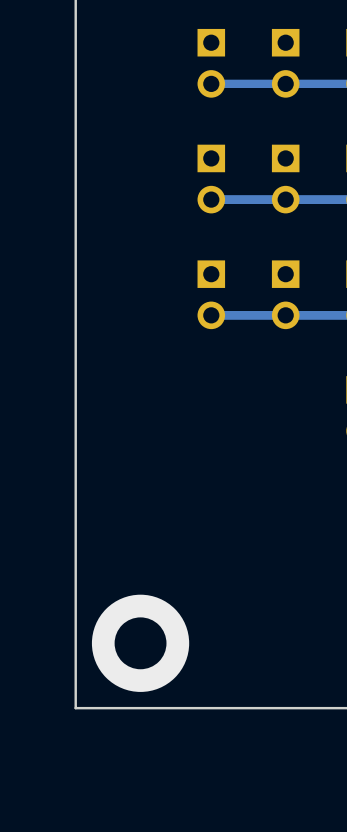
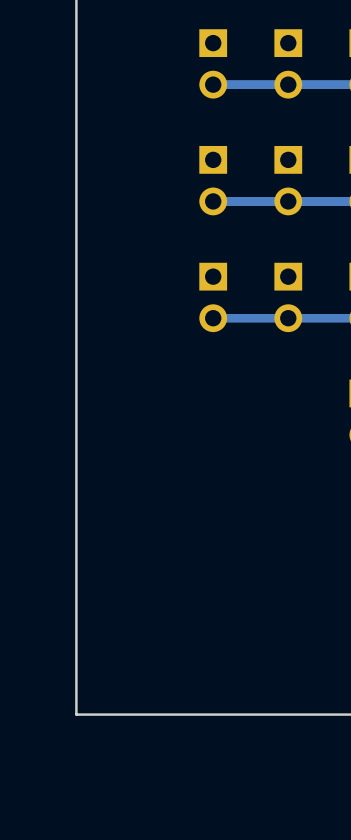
via: (140, 643) -> none

